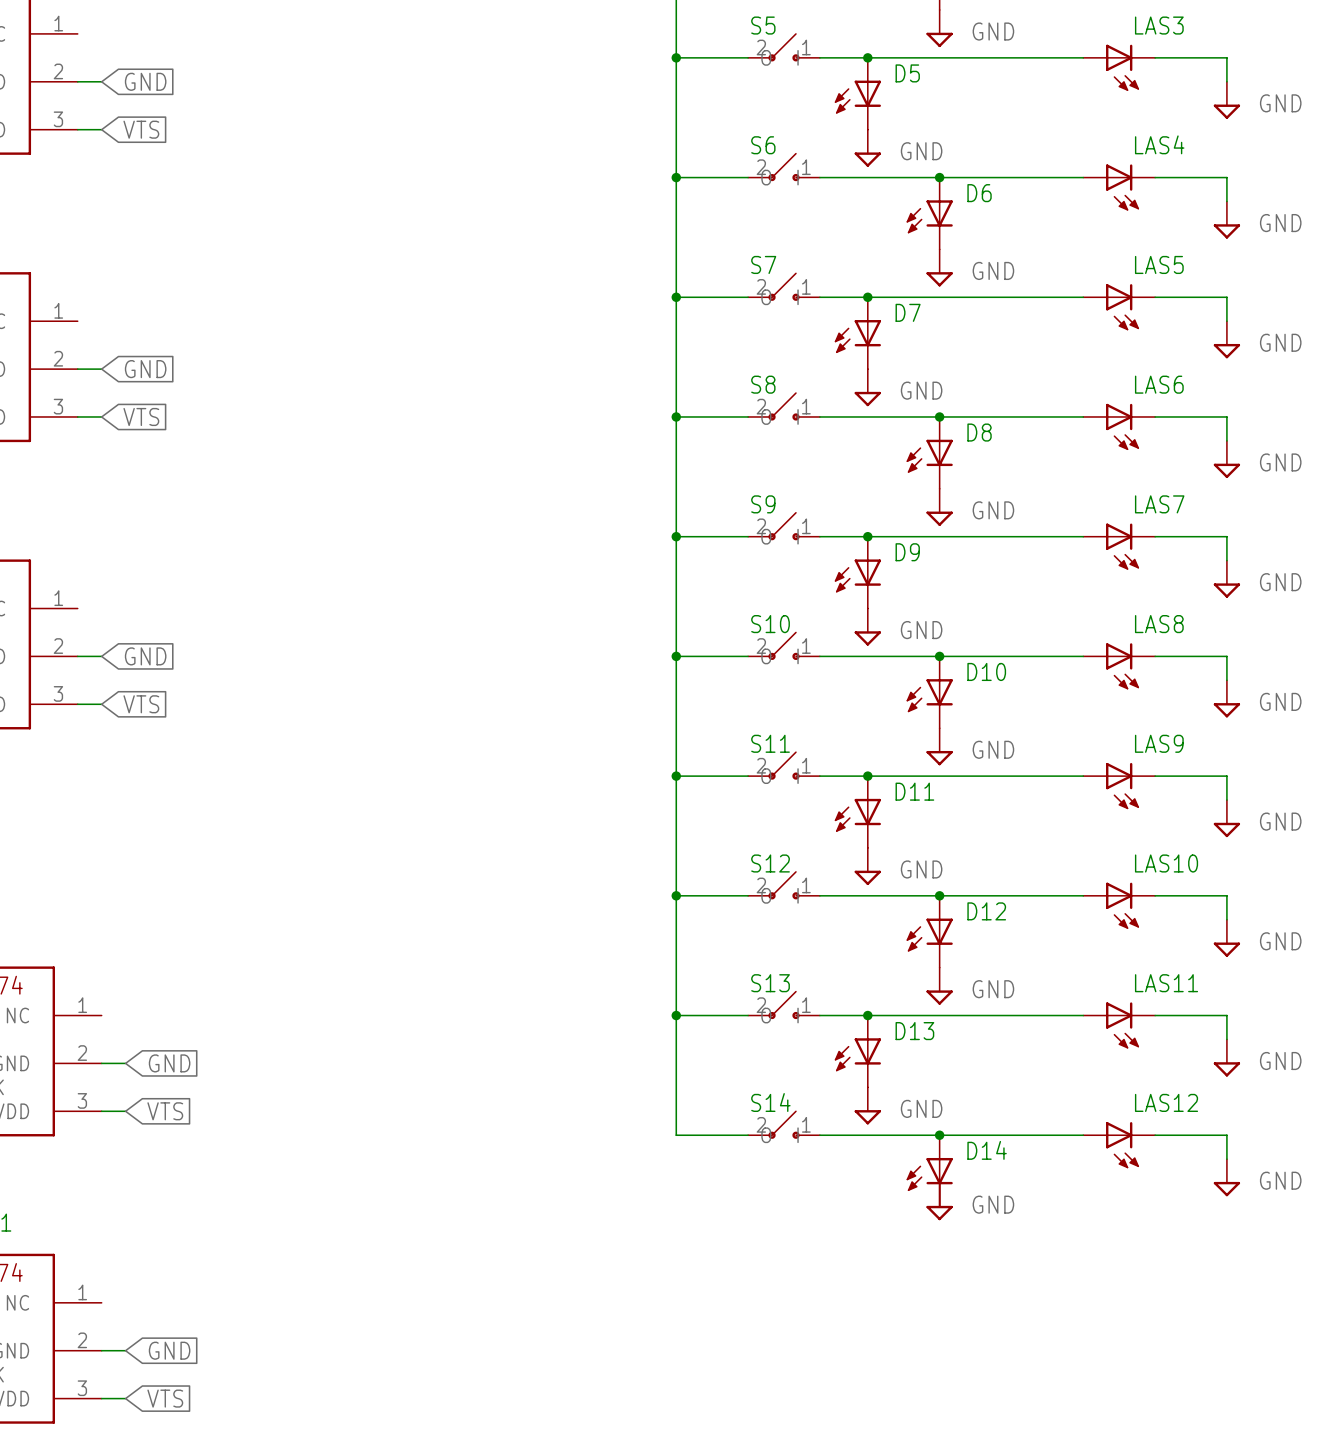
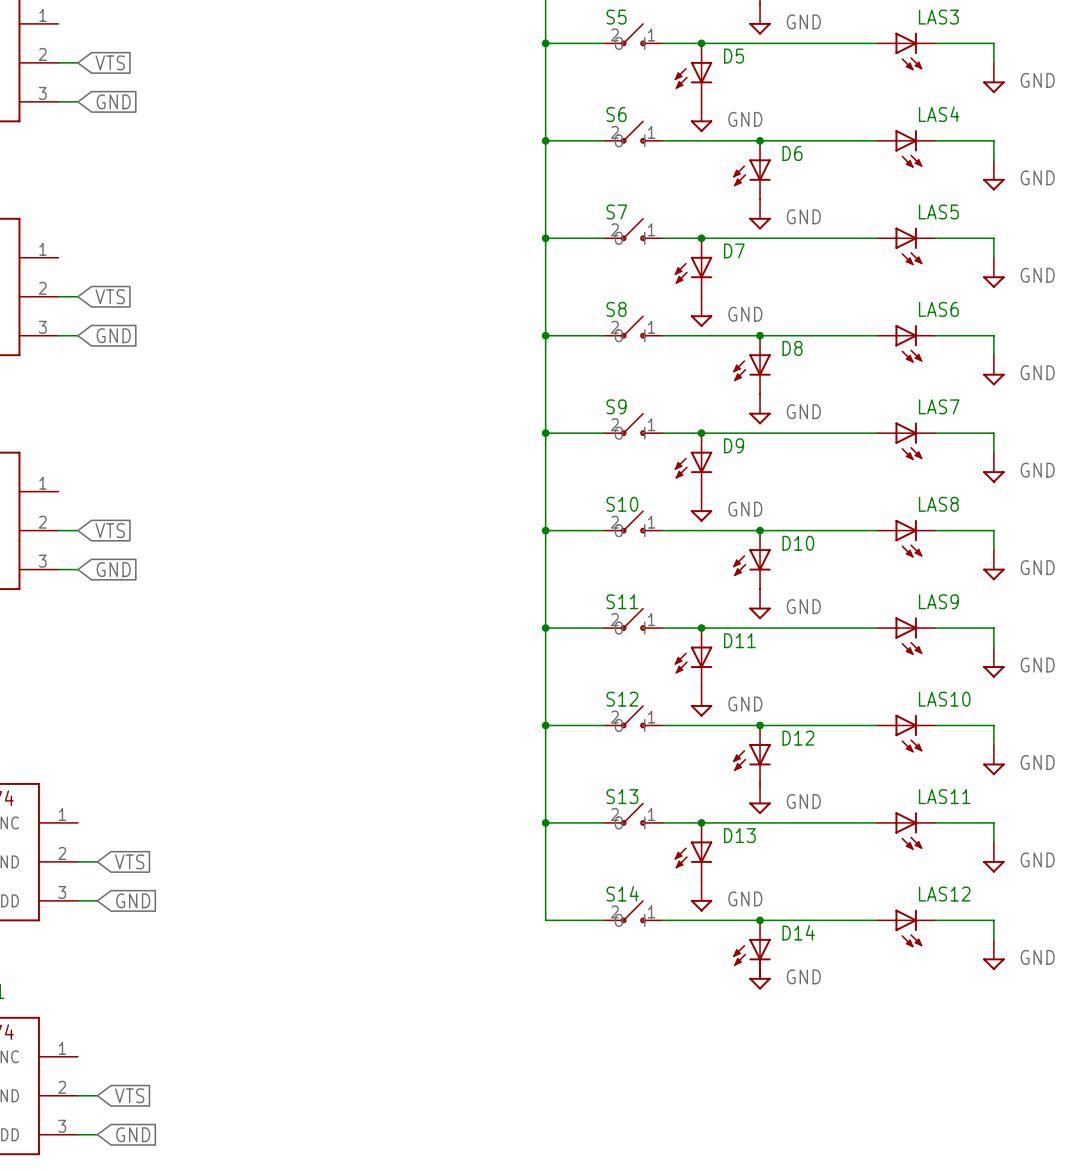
global label: GND (145, 81) -> VTS (110, 62)
global label: VTS (141, 129) -> GND (113, 101)
global label: GND (145, 369) -> VTS (110, 296)
global label: VTS (141, 416) -> GND (113, 335)
global label: GND (145, 656) -> VTS (110, 530)
global label: VTS (141, 704) -> GND (113, 569)
global label: GND (169, 1063) -> VTS (129, 861)
global label: VTS (165, 1111) -> GND (133, 900)
global label: GND (169, 1350) -> VTS (129, 1095)
global label: VTS (165, 1398) -> GND (133, 1134)

